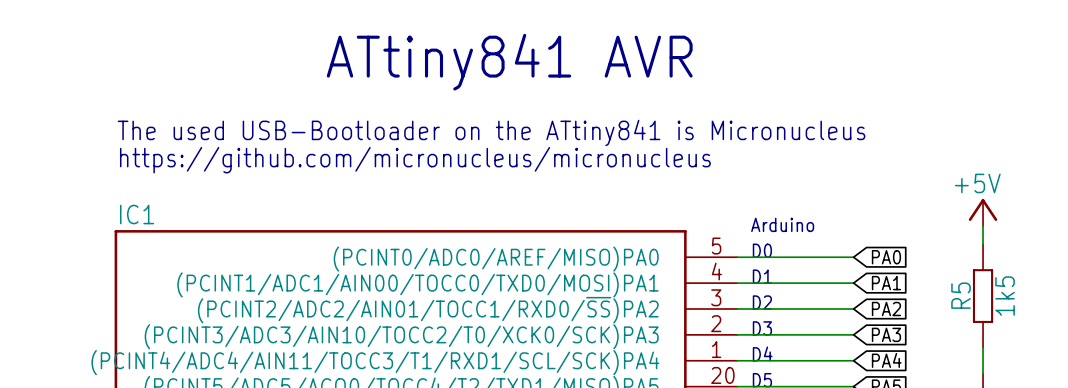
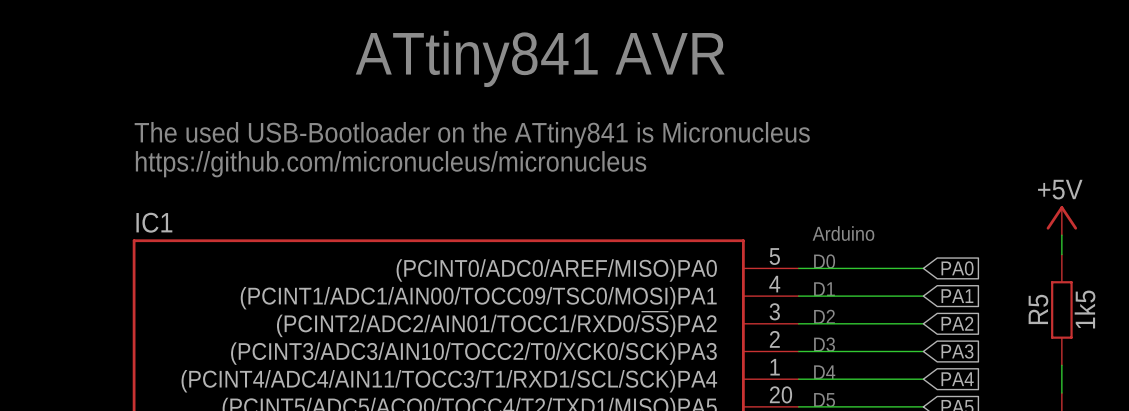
IC1 pin name: (PCINT1/ADC1/AIN00/TOCC0/TXD0/MOSI)PA1 (417, 284) -> (PCINT1/ADC1/AIN00/TOCC09/TSC0/MOSI)PA1 (478, 298)

